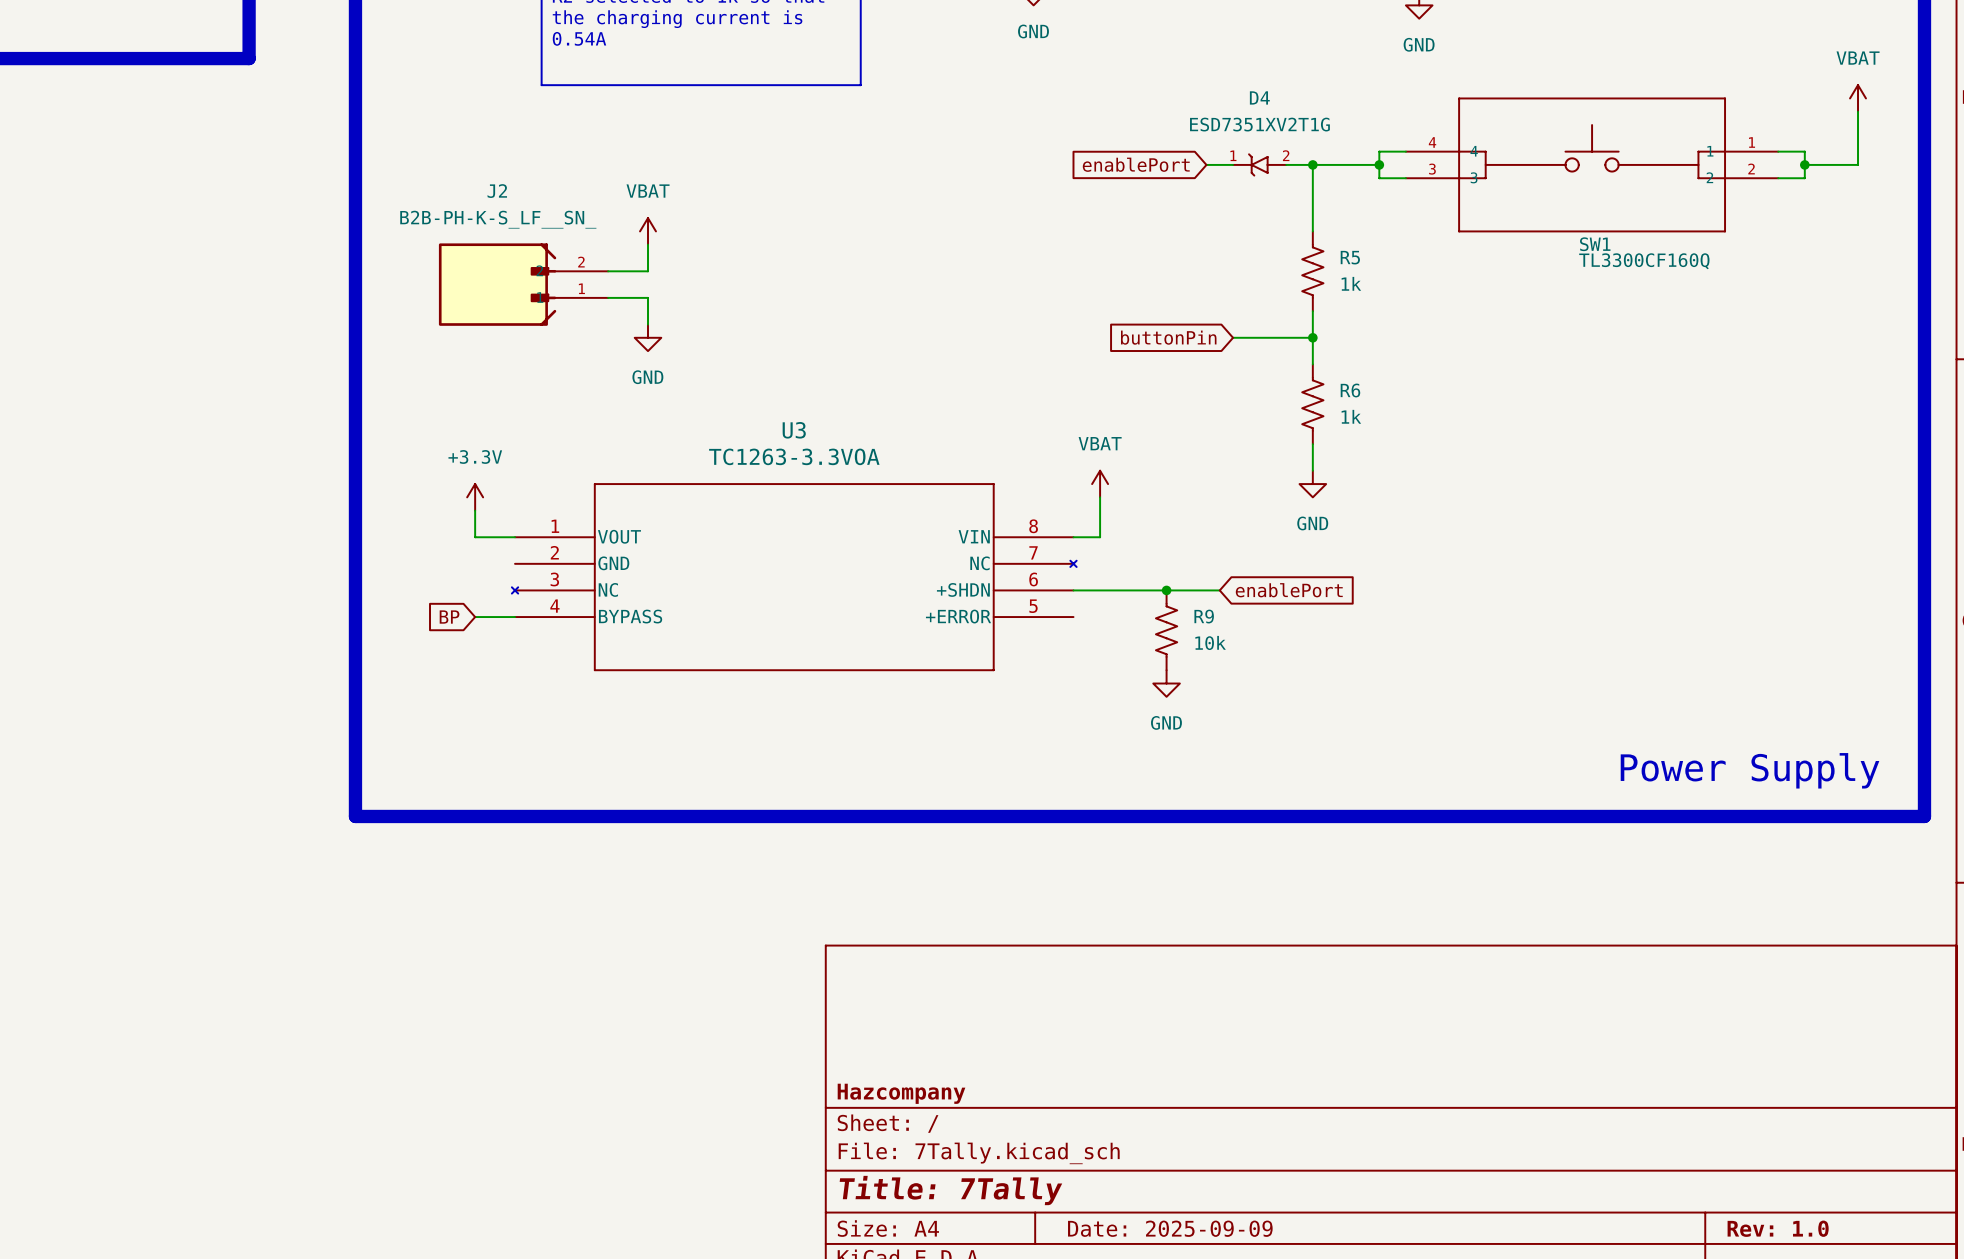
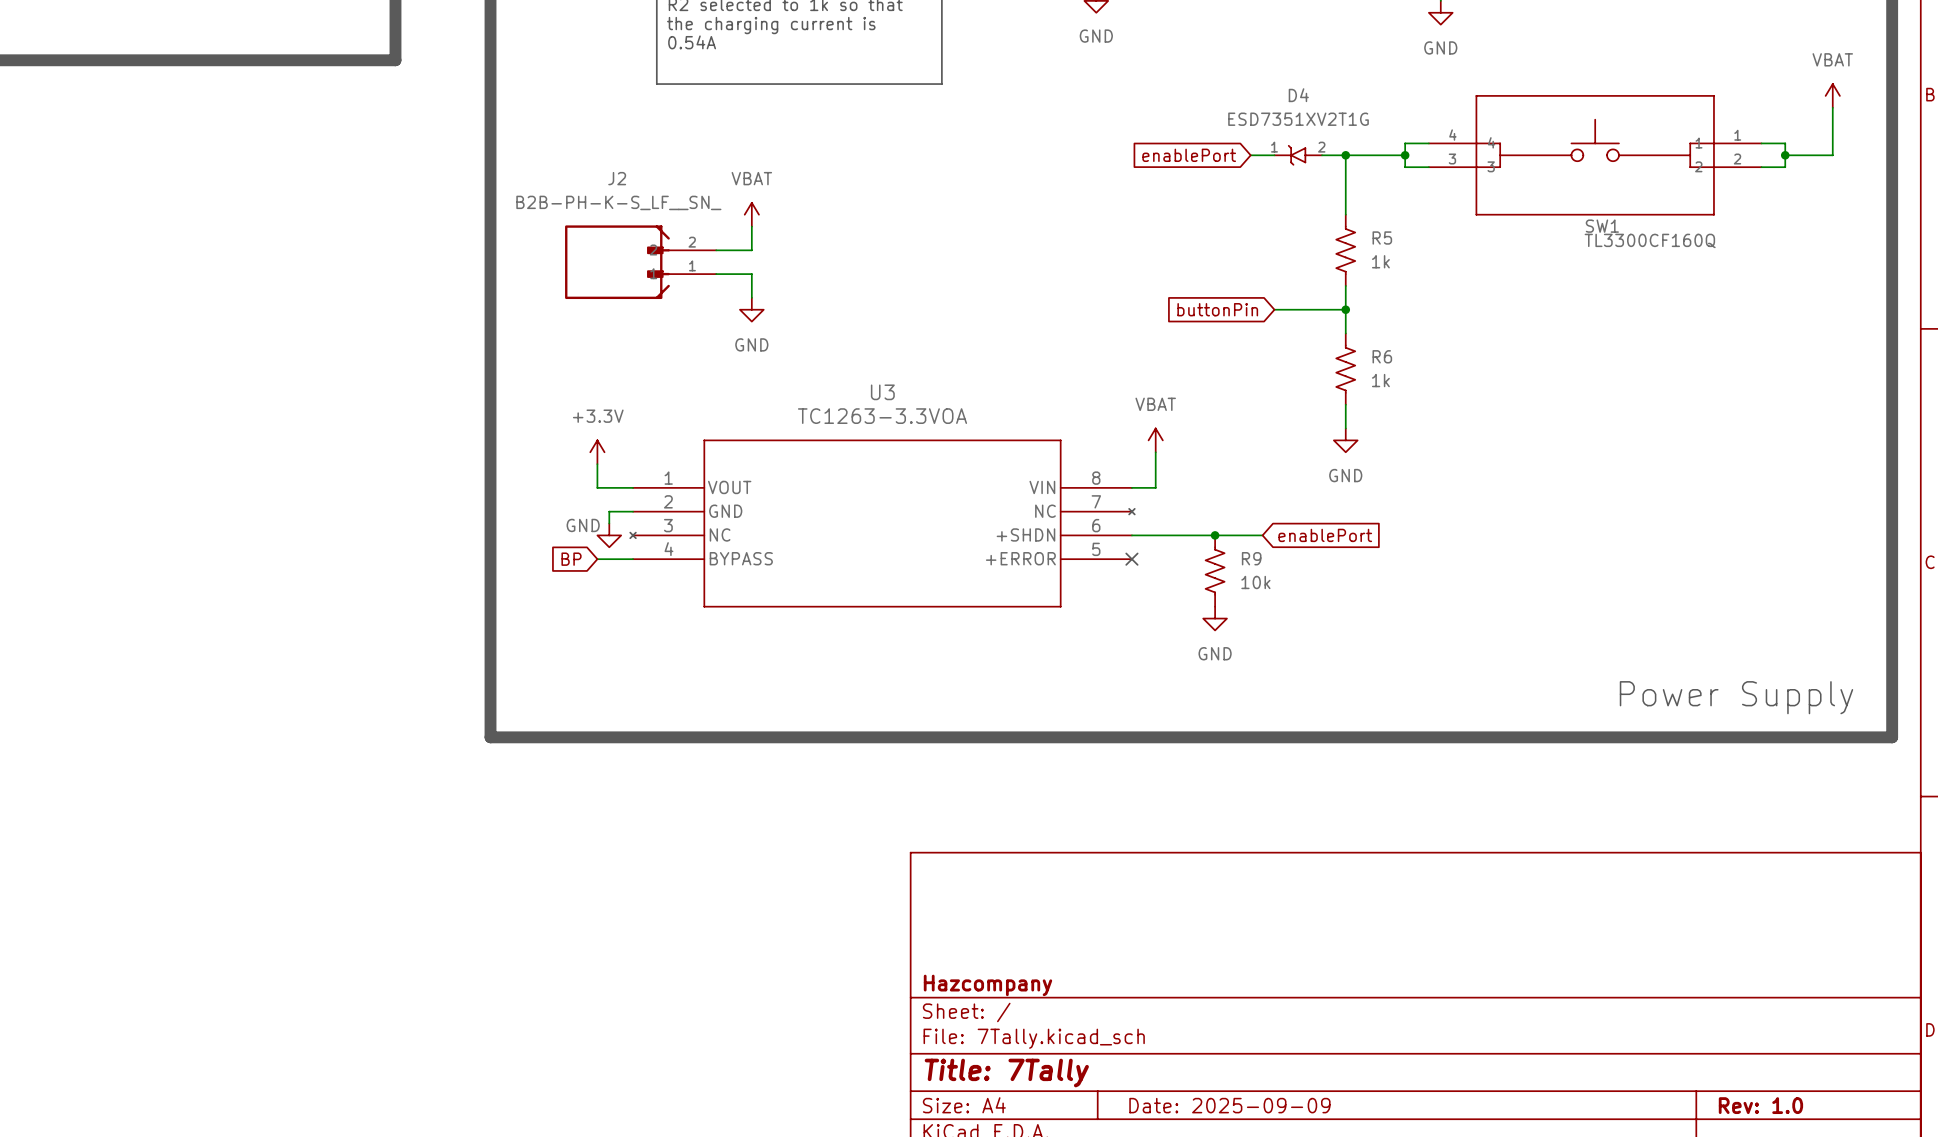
wire: none -> (633, 511) (609, 511) (609, 523)
power symbol: none -> GND (609, 535)
no-connect mark: none -> (1131, 559)

